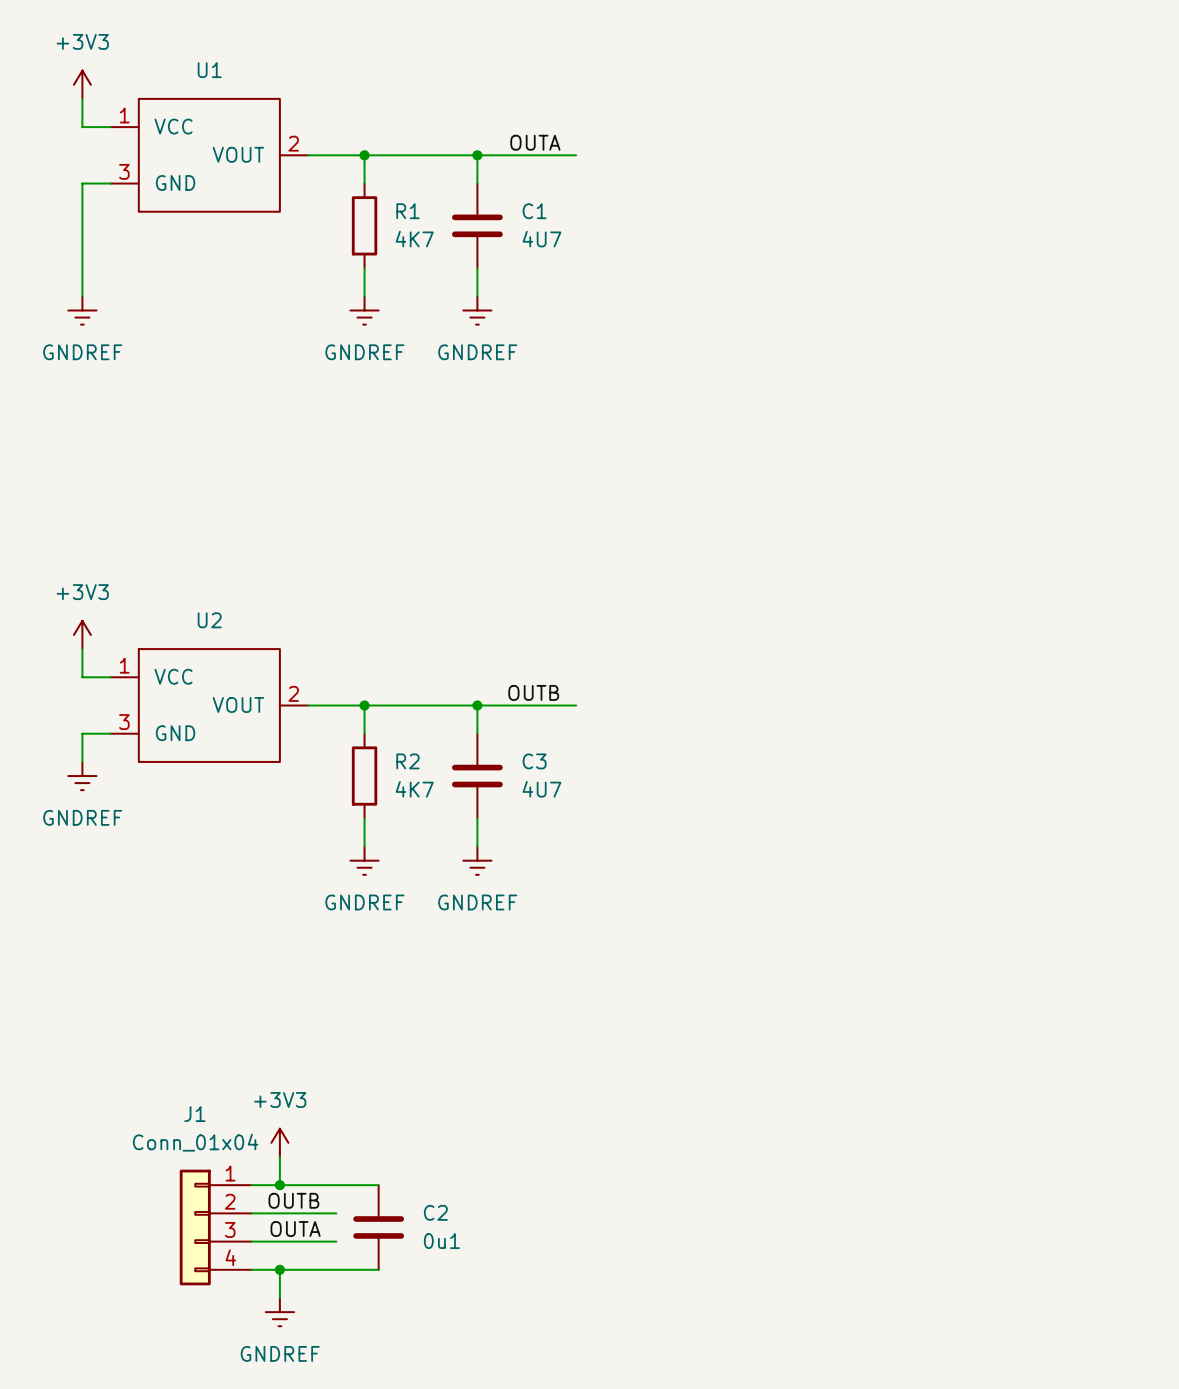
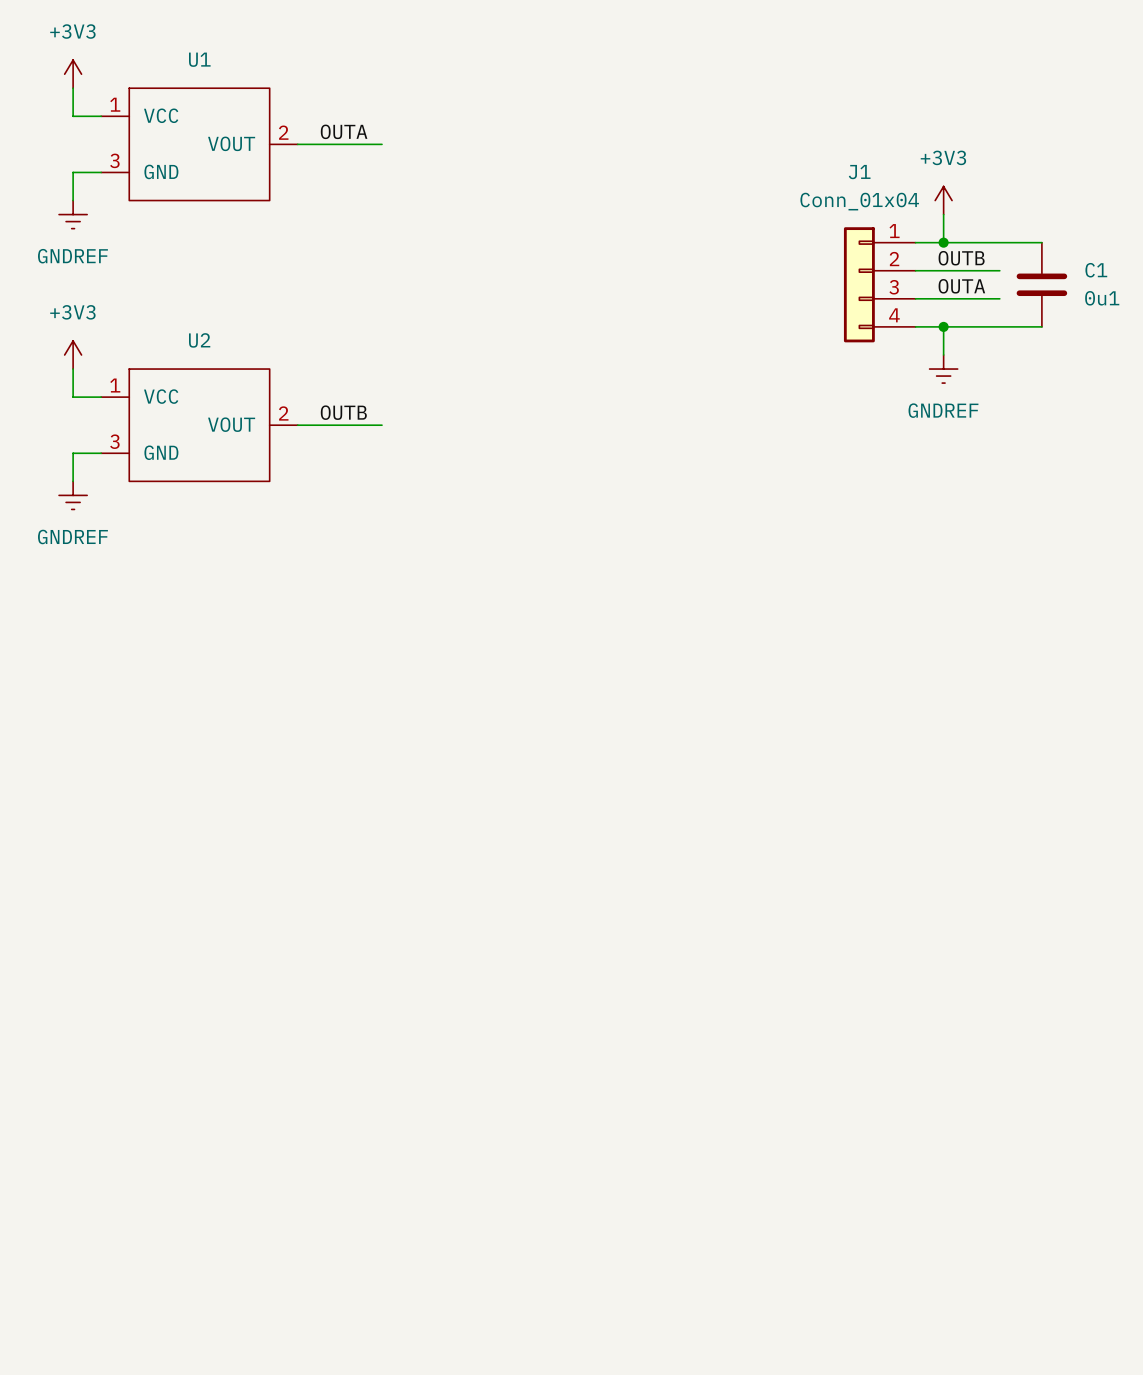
label position: OUTA (535, 142) -> OUTA (344, 131)
wire: (364, 155) (364, 183) -> none
junction: (364, 155) -> none
wire: (392, 155) (576, 155) -> none
wire: (477, 155) (477, 183) -> none
junction: (477, 155) -> none
wire: (82, 211) (82, 296) -> none
power symbol: none -> +3V3 (943, 200)
R1: 4K7 (364, 225) -> none
C1 position: (477, 225) -> (1041, 284)
wire: none -> (943, 214) (943, 242)
C1 value: 4U7 (542, 239) -> 0u1 (1102, 298)
wire: none -> (915, 242) (1041, 242)
junction: none -> (943, 242)
wire: (364, 268) (364, 296) -> none
wire: (477, 268) (477, 296) -> none
label: none -> OUTB (961, 258)
wire: none -> (915, 270) (999, 270)
label: none -> OUTA (961, 286)
power symbol position: GNDREF (82, 310) -> GNDREF (73, 214)
power symbol: GNDREF (364, 310) -> none
power symbol: GNDREF (477, 310) -> none
wire: none -> (915, 298) (999, 298)
wire: none -> (915, 326) (1041, 326)
wire: none -> (943, 326) (943, 354)
junction: none -> (943, 326)
power symbol: none -> GNDREF (943, 369)
label: none -> OUTB (343, 412)
wire: none -> (297, 425) (382, 425)
power symbol: none -> GNDREF (73, 495)
power symbol position: +3V3 (82, 634) -> +3V3 (73, 354)
wire: (82, 649) (82, 677) (110, 677) -> (73, 369) (73, 397) (101, 397)
label: OUTB (533, 692) -> none
U2 position: (209, 705) -> (199, 425)
wire: (308, 705) (576, 705) -> none
wire: (364, 705) (364, 733) -> none
junction: (364, 705) -> none
wire: (477, 705) (477, 733) -> none
junction: (477, 705) -> none
wire: (110, 733) (82, 733) (82, 761) -> (101, 453) (73, 453) (73, 481)
power symbol: GNDREF (82, 776) -> none
R2: 4K7 (364, 776) -> none
C3: 4U7 (477, 776) -> none
wire: (364, 818) (364, 846) -> none
wire: (477, 818) (477, 846) -> none
power symbol: GNDREF (364, 860) -> none
power symbol: GNDREF (477, 860) -> none
power symbol: +3V3 (279, 1142) -> none
wire: (279, 1156) (279, 1185) -> none
wire: (251, 1185) (378, 1185) -> none
junction: (279, 1185) -> none
label: OUTB (293, 1200) -> none
wire: (251, 1213) (336, 1213) -> none
J1 position: (215, 1227) -> (879, 284)
C2: 0u1 (378, 1227) -> none
label: OUTA (295, 1229) -> none
wire: (251, 1241) (336, 1241) -> none
wire: (251, 1269) (378, 1269) -> none
wire: (279, 1269) (279, 1298) -> none
junction: (279, 1269) -> none
power symbol: GNDREF (279, 1312) -> none

